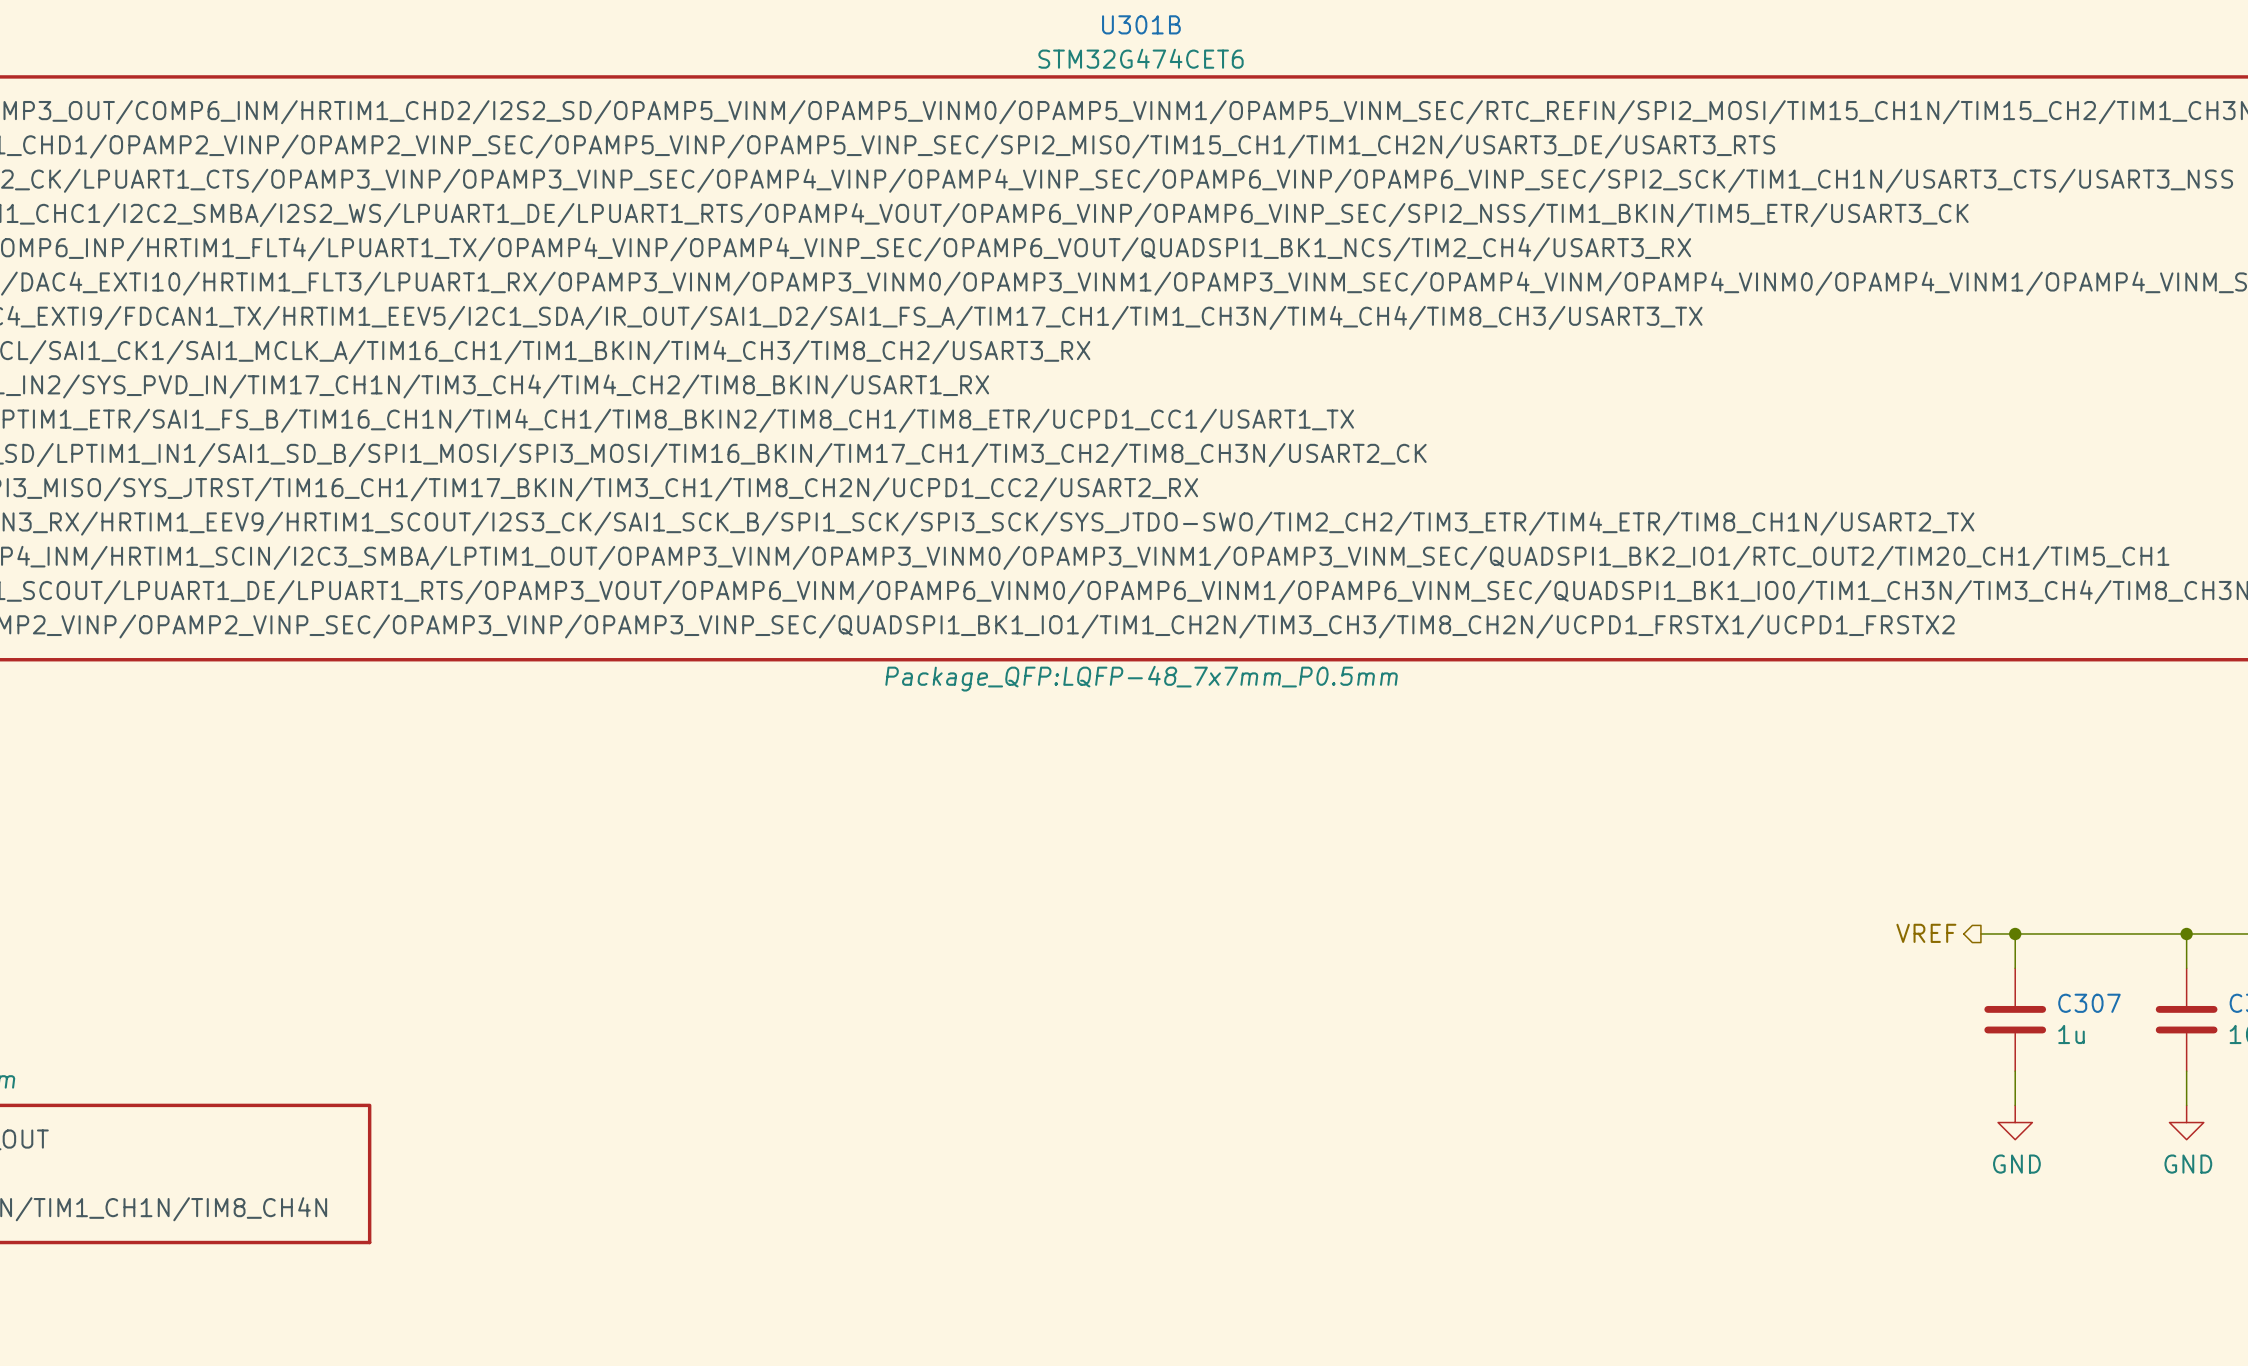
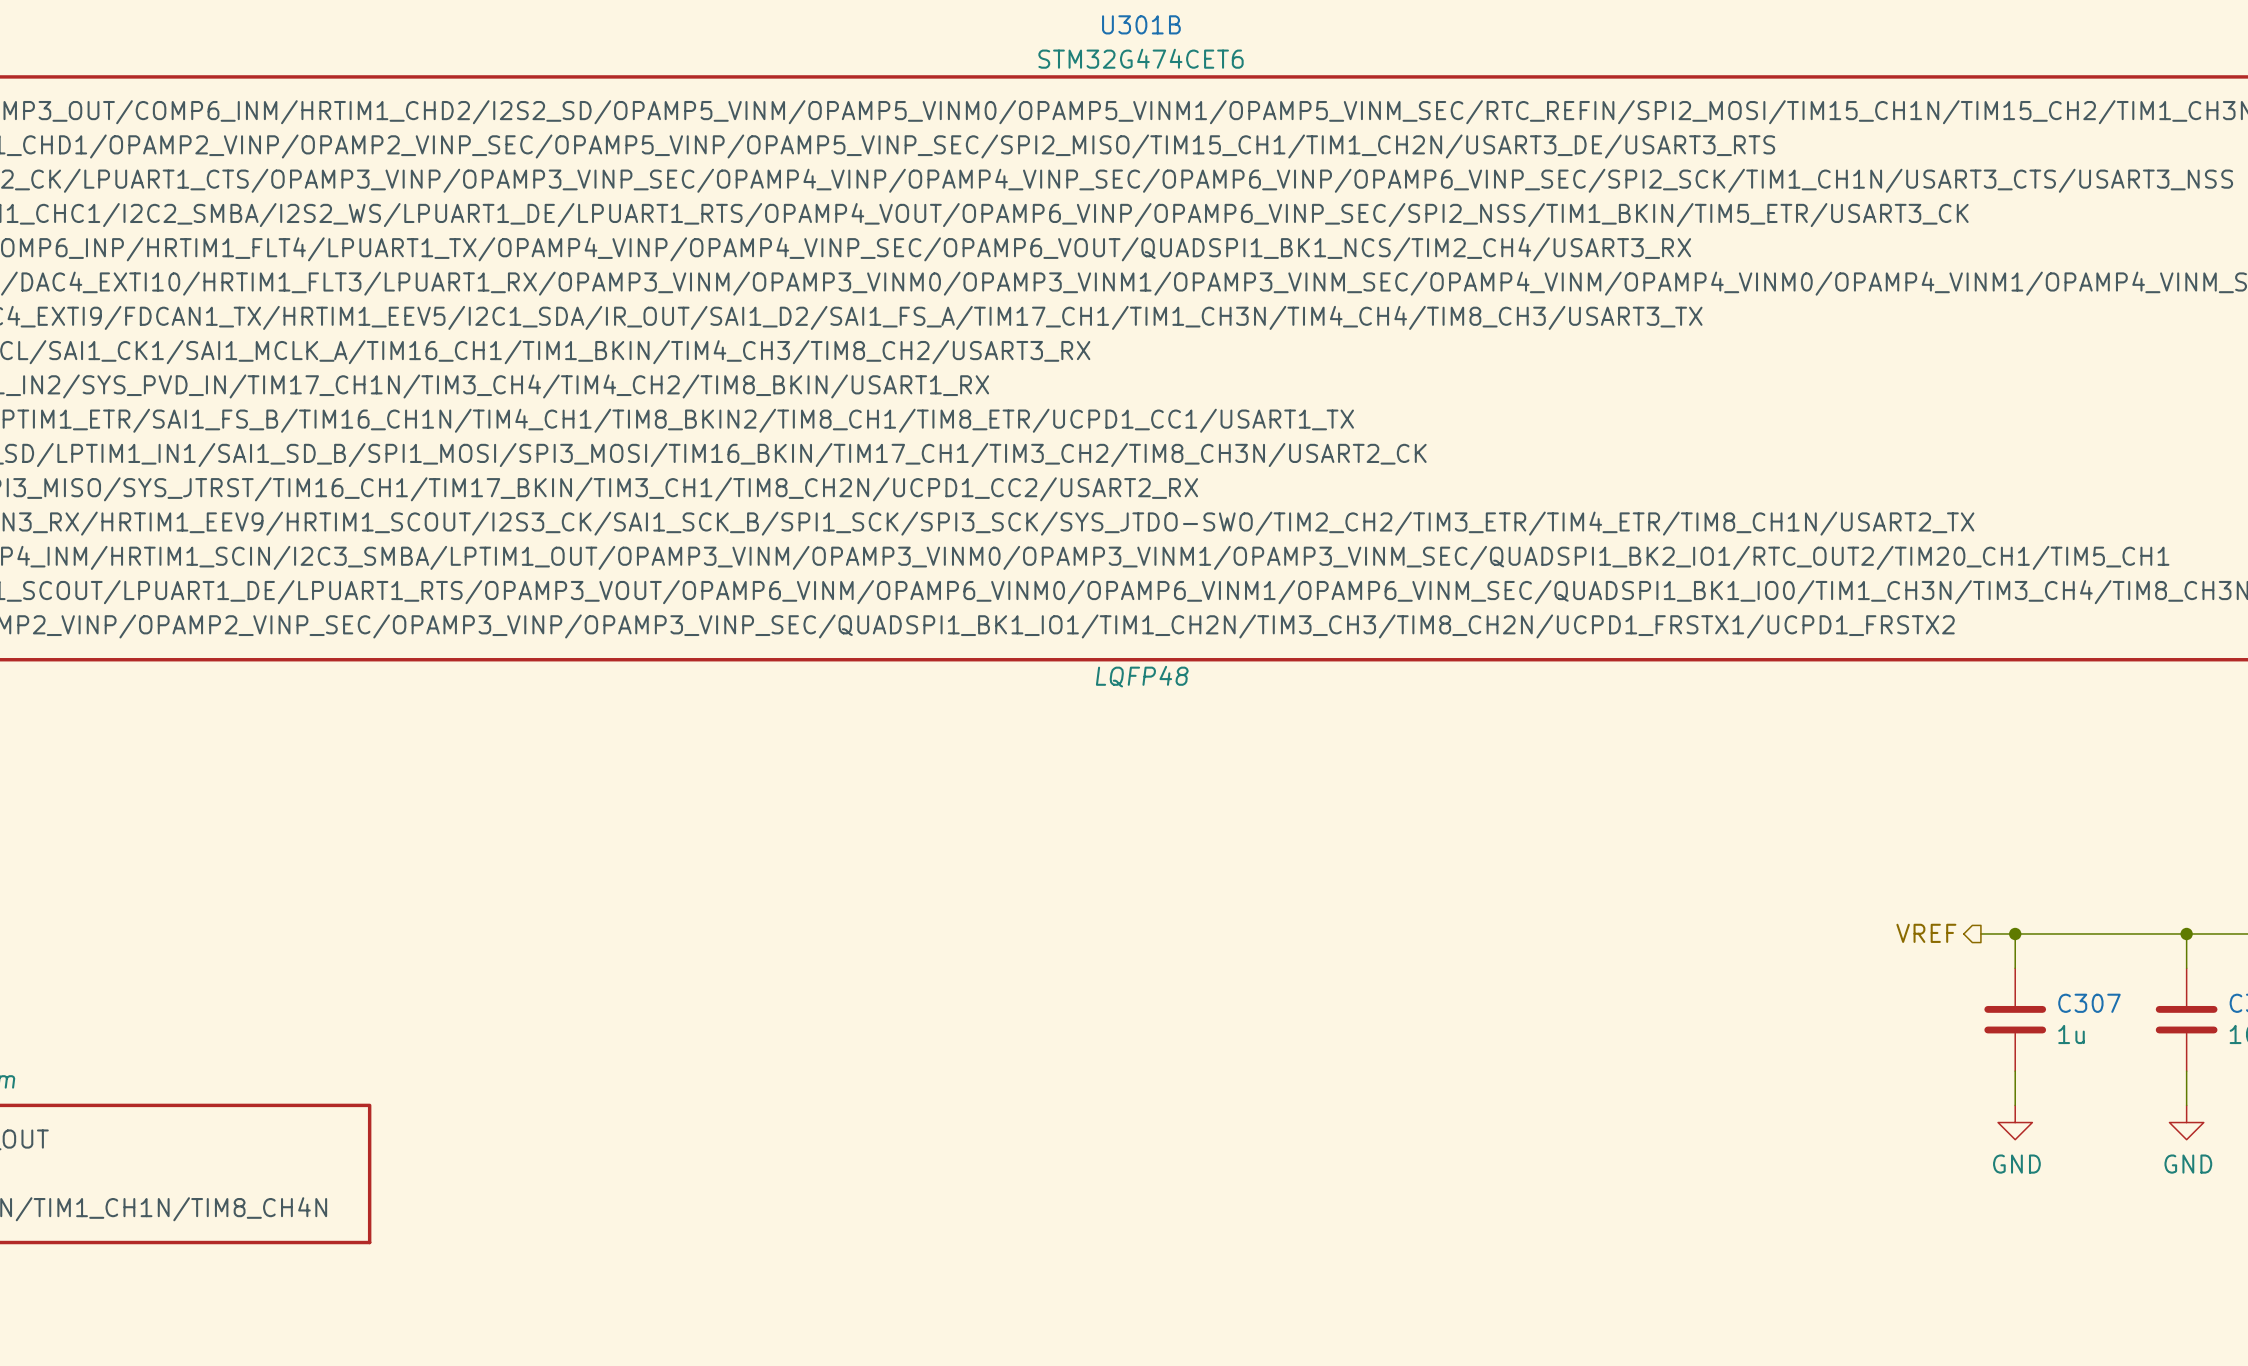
U301B text: Package_QFP:LQFP-48_7x7mm_P0.5mm (1141, 678) -> LQFP48 (1142, 676)

